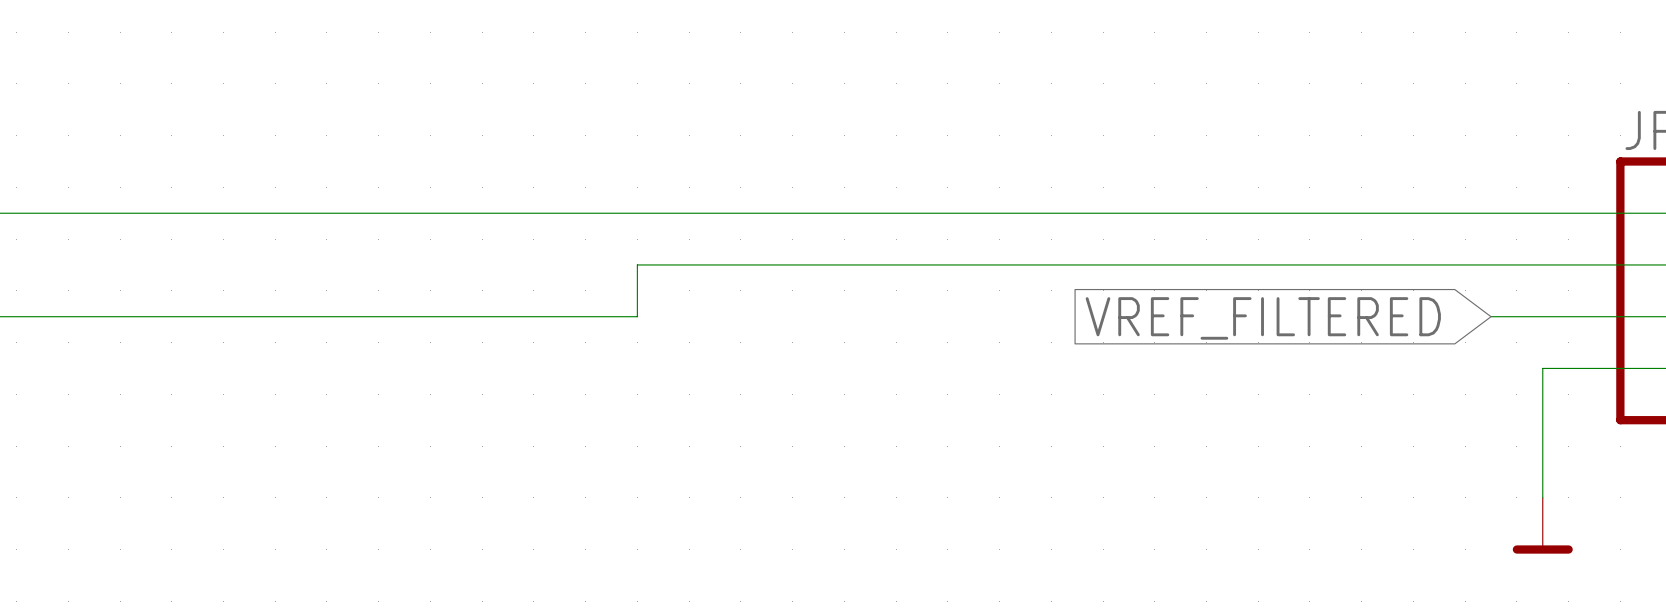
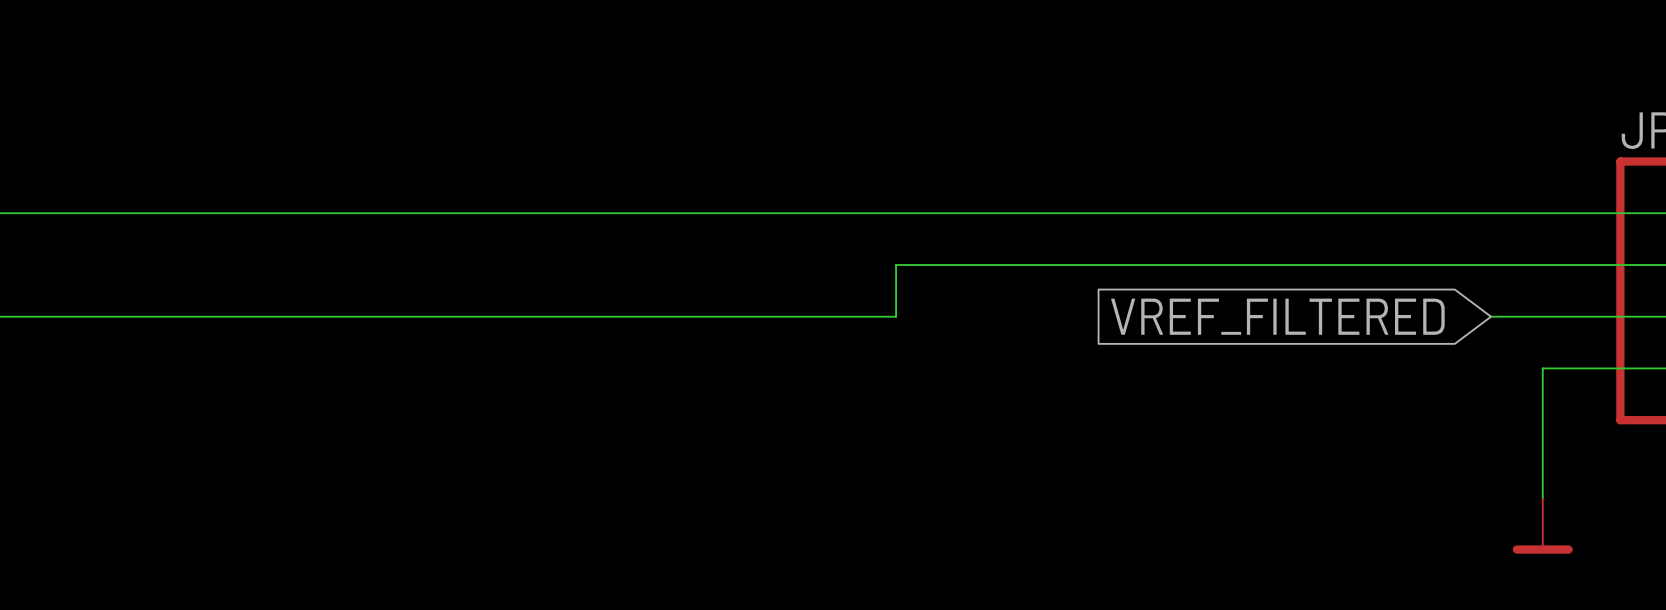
wire: (896, 264) (637, 264) (637, 316) -> (896, 264) (896, 316) (637, 316)

